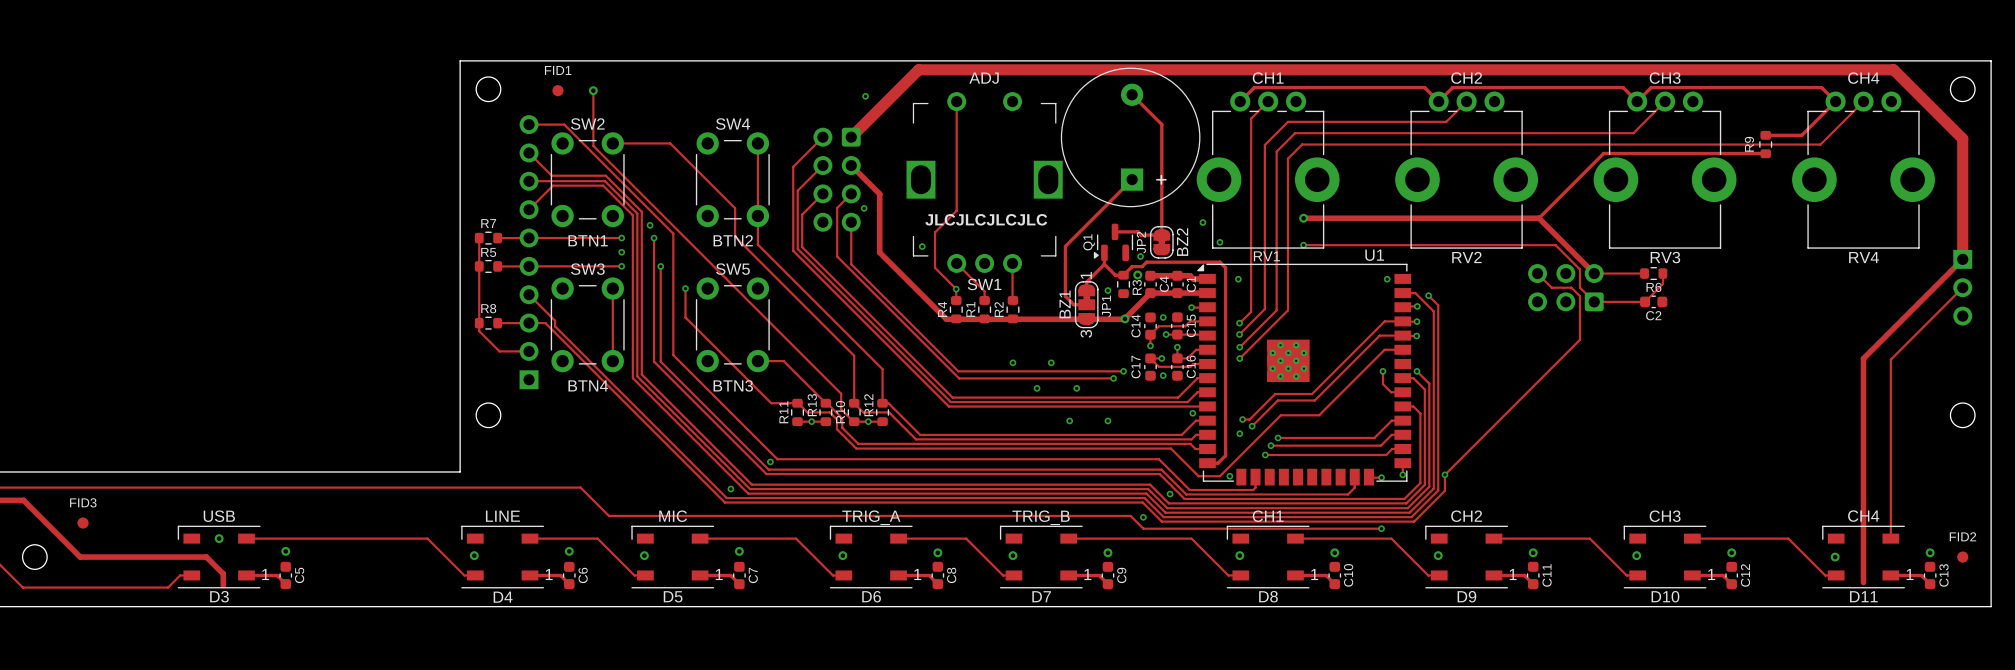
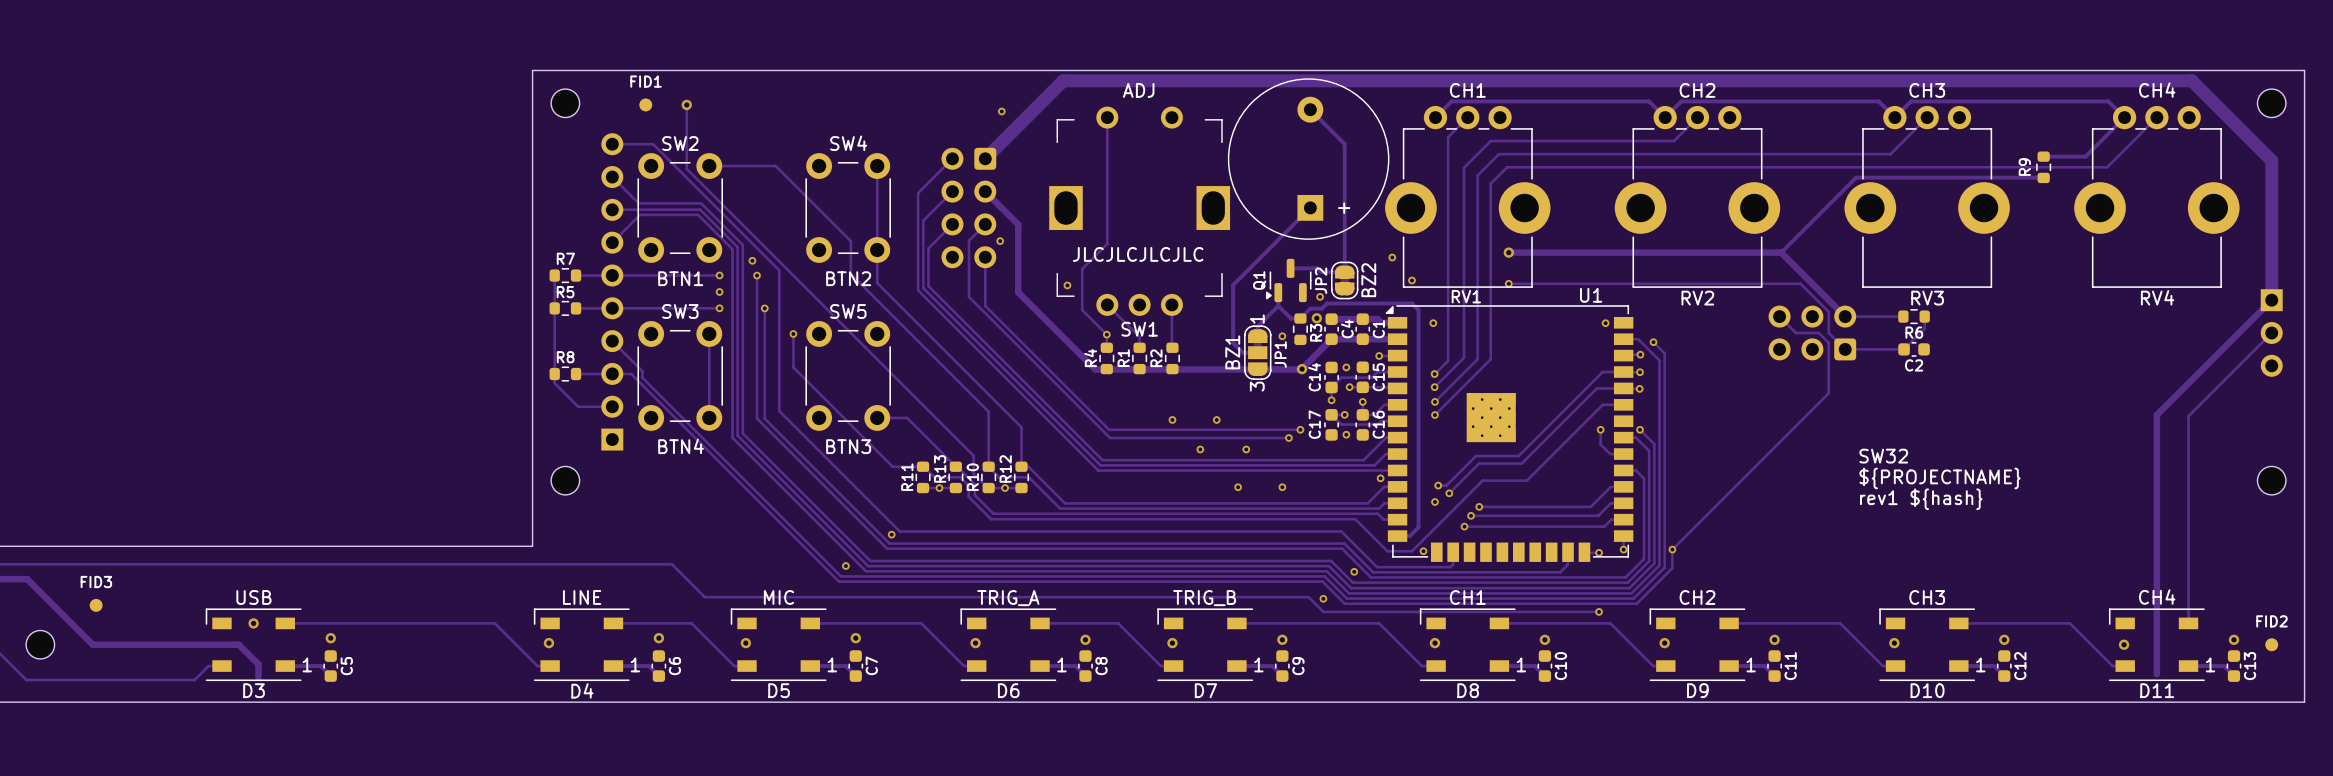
text: none -> SW32 (1883, 456)
text: none -> ${PROJECTNAME} (1940, 478)
text: none -> rev1 ${hash} (1921, 499)

